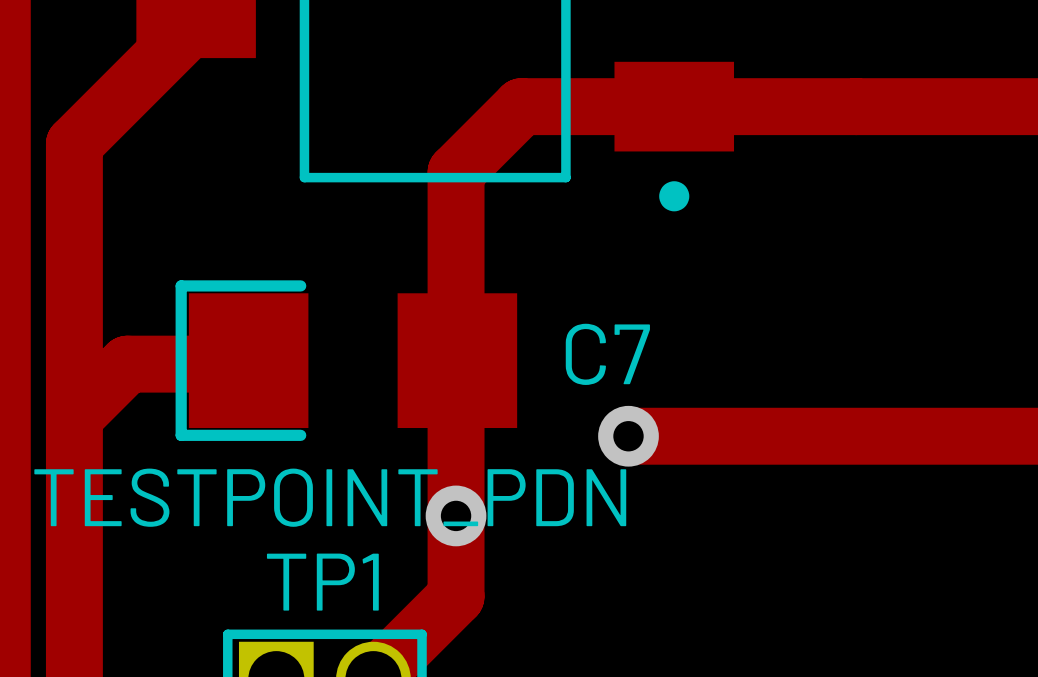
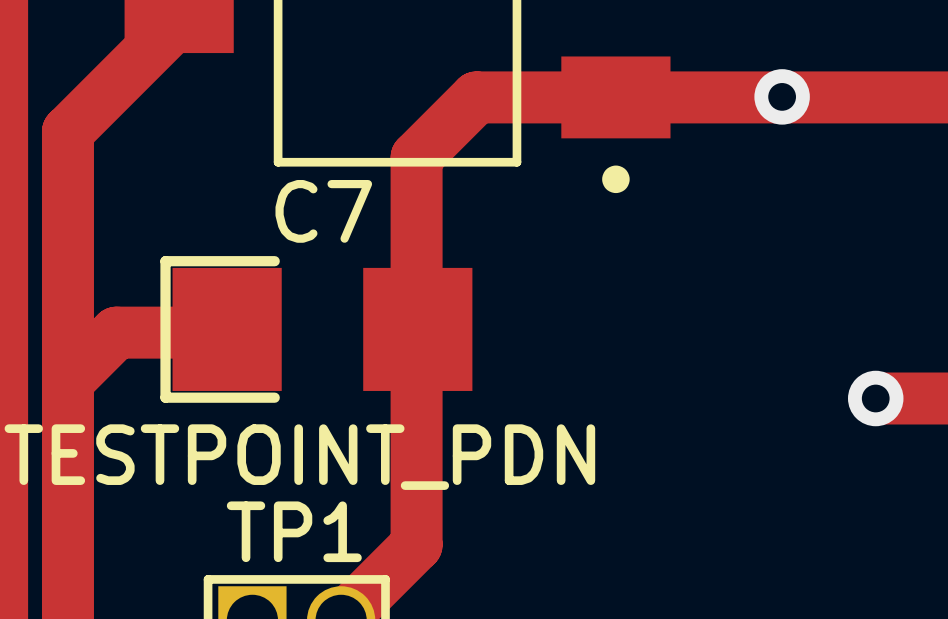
via: none -> (782, 96)
C7 name position: C7 (607, 354) -> C7 (323, 211)
track: (628, 436) (958, 436) -> none
via: (628, 436) -> none
via: none -> (875, 398)
via: (456, 515) -> none

